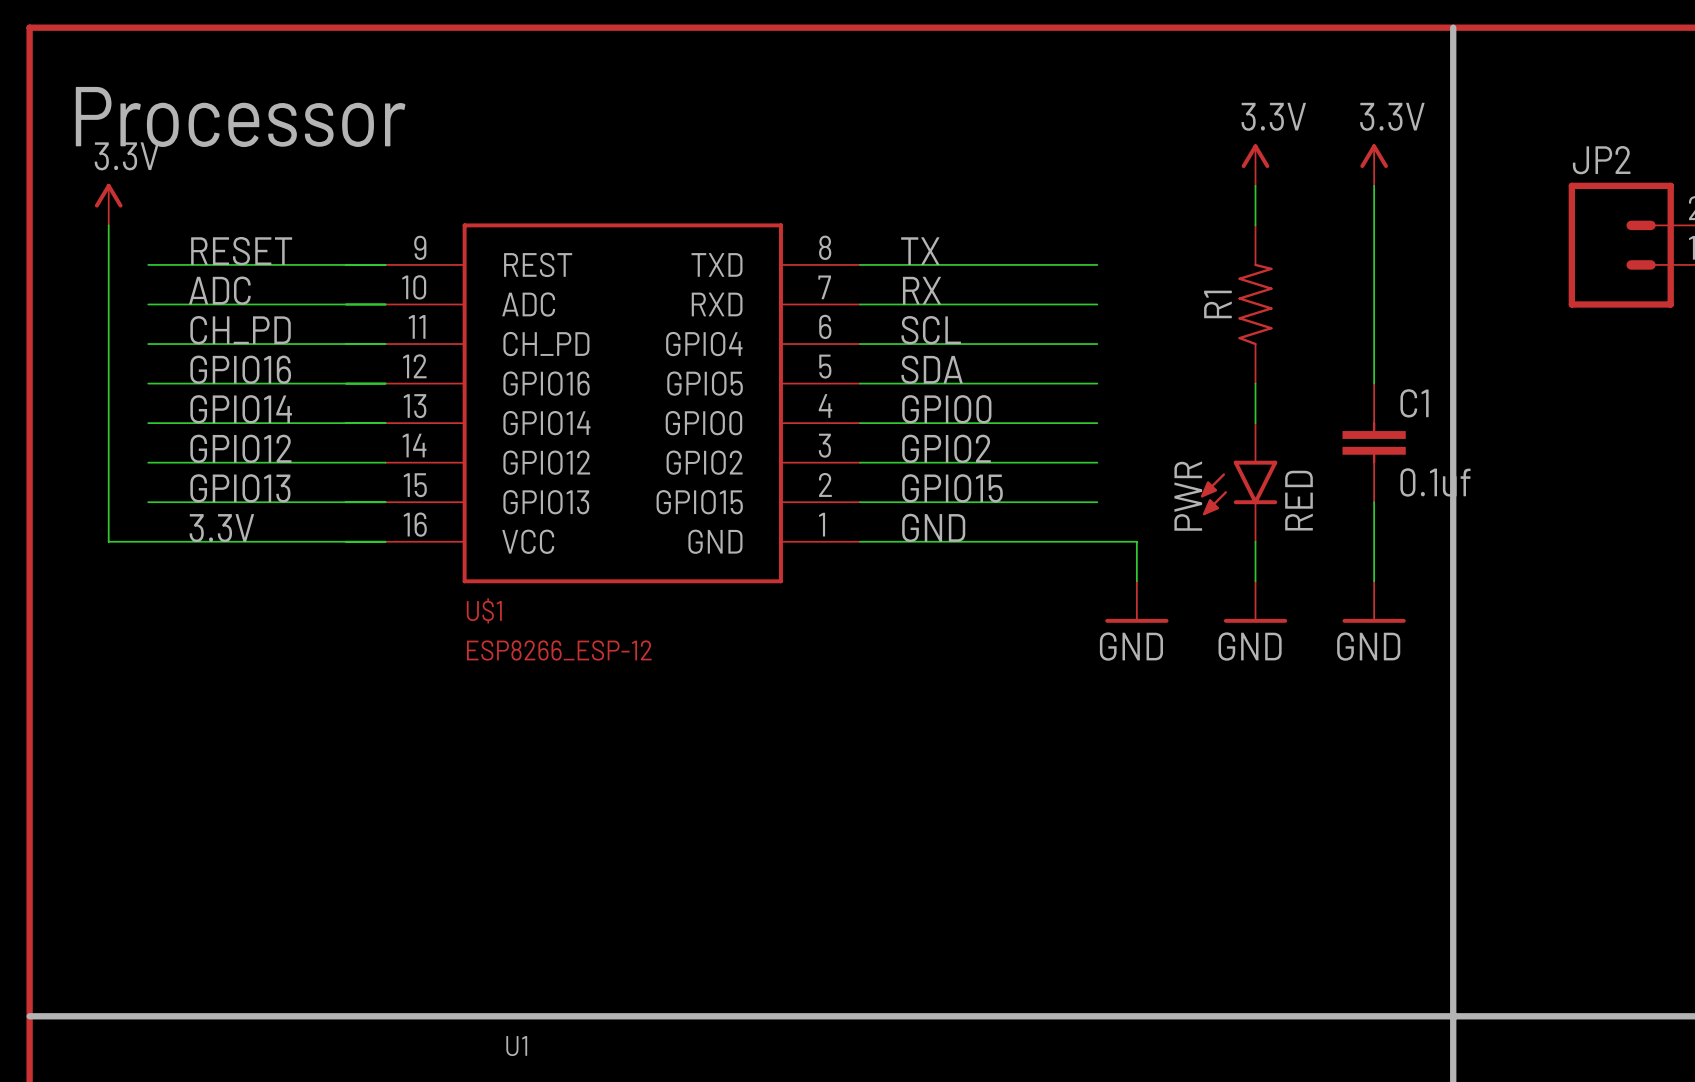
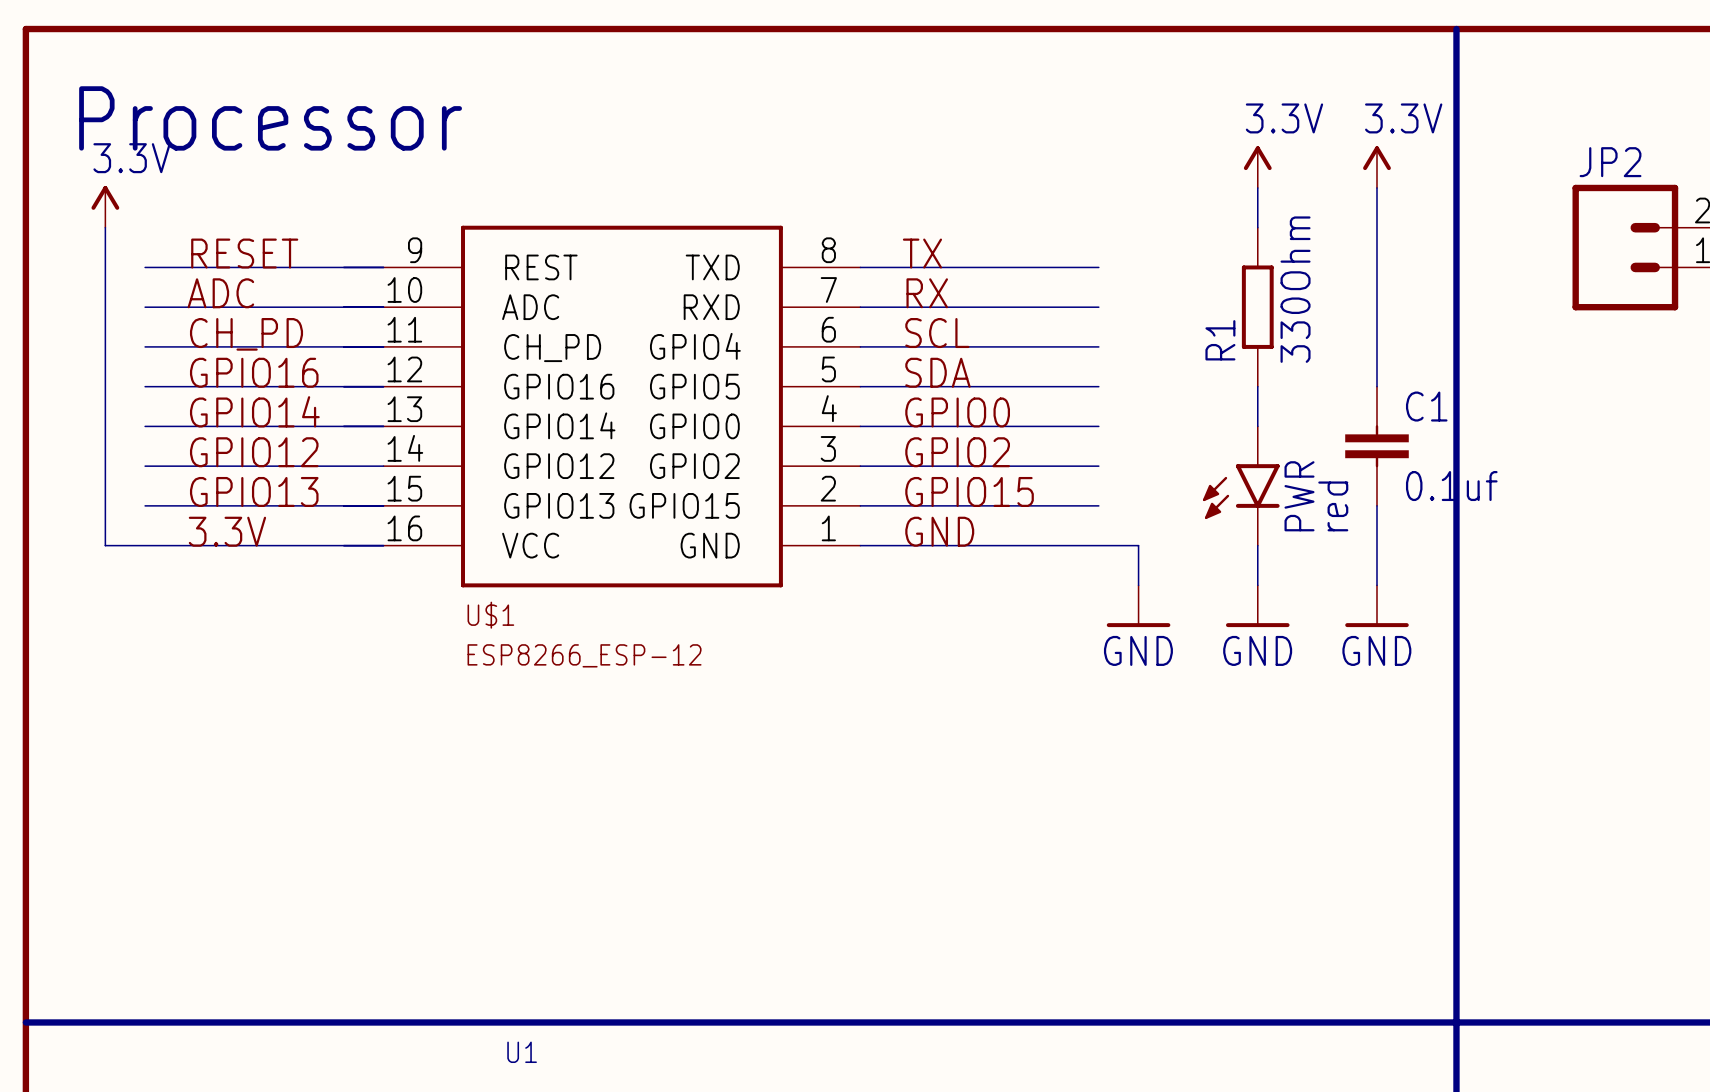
R1 symbol: [1238, 225, 1273, 384] -> [1241, 227, 1274, 387]
R1 value: none -> 330Ohm (1295, 289)
R1 name position: R1 (1217, 304) -> R1 (1220, 340)
PWR name position: PWR (1188, 496) -> PWR (1299, 496)
PWR value: RED (1299, 500) -> red (1333, 506)

